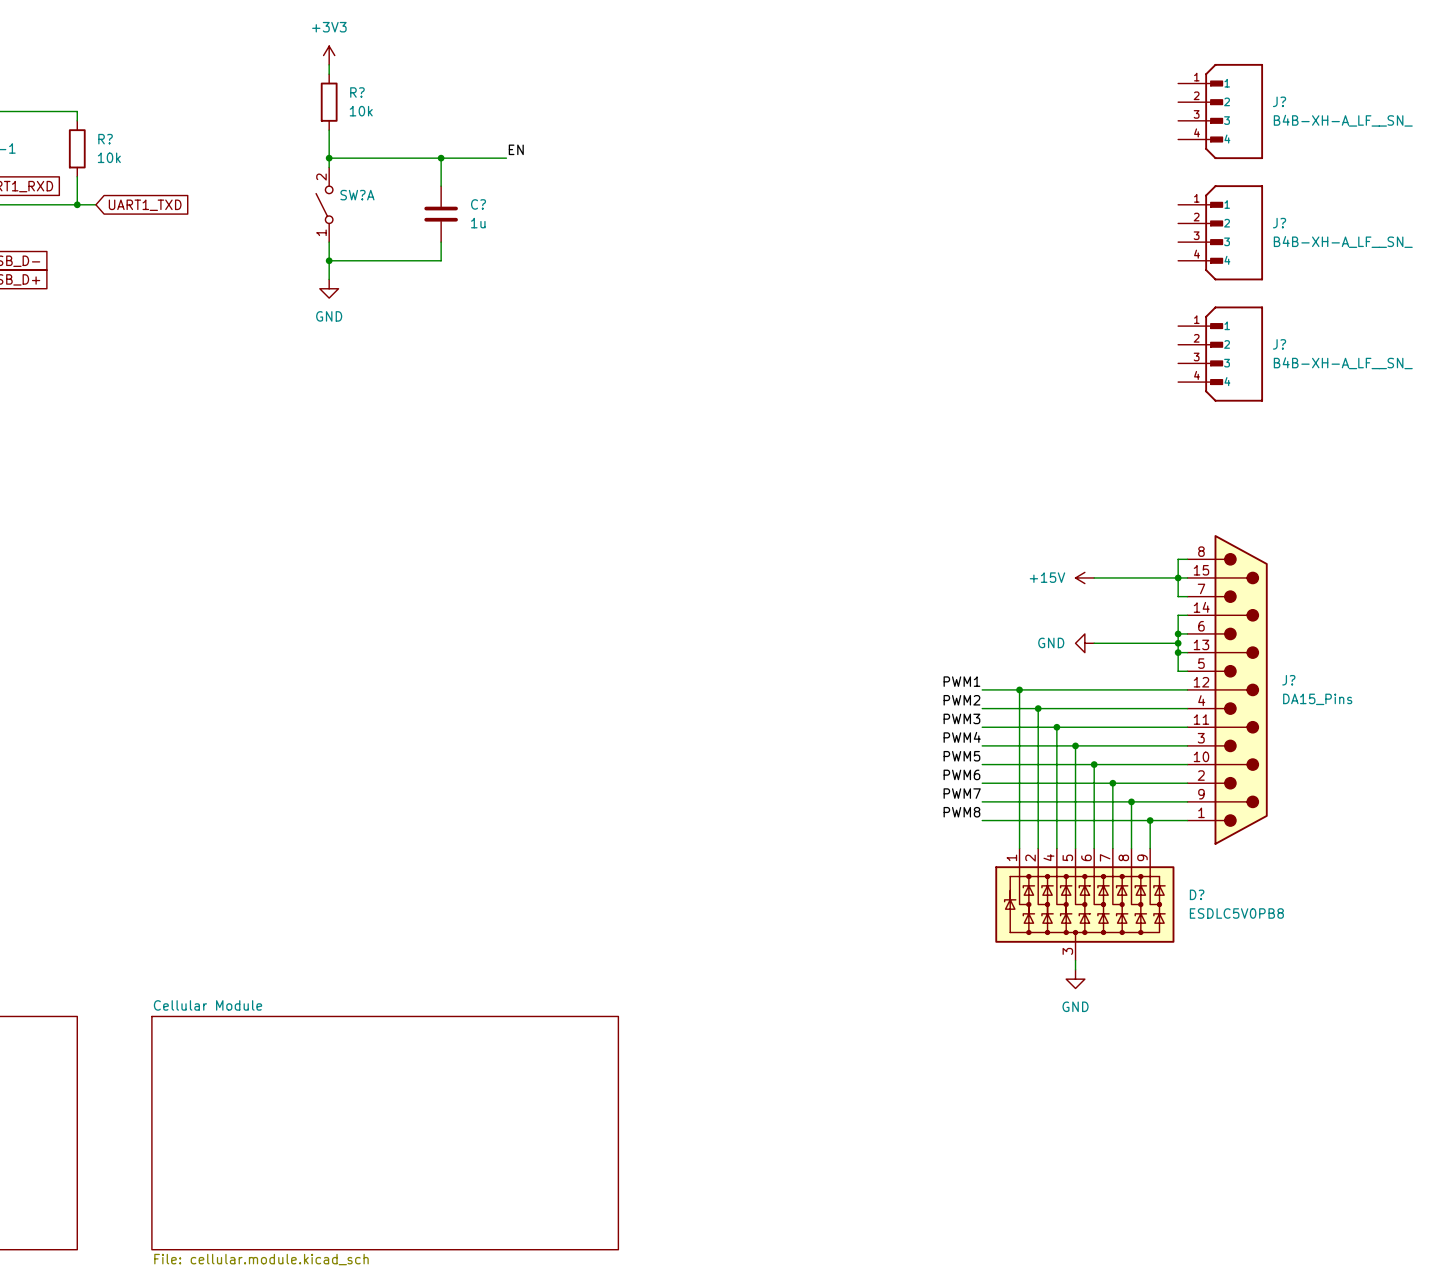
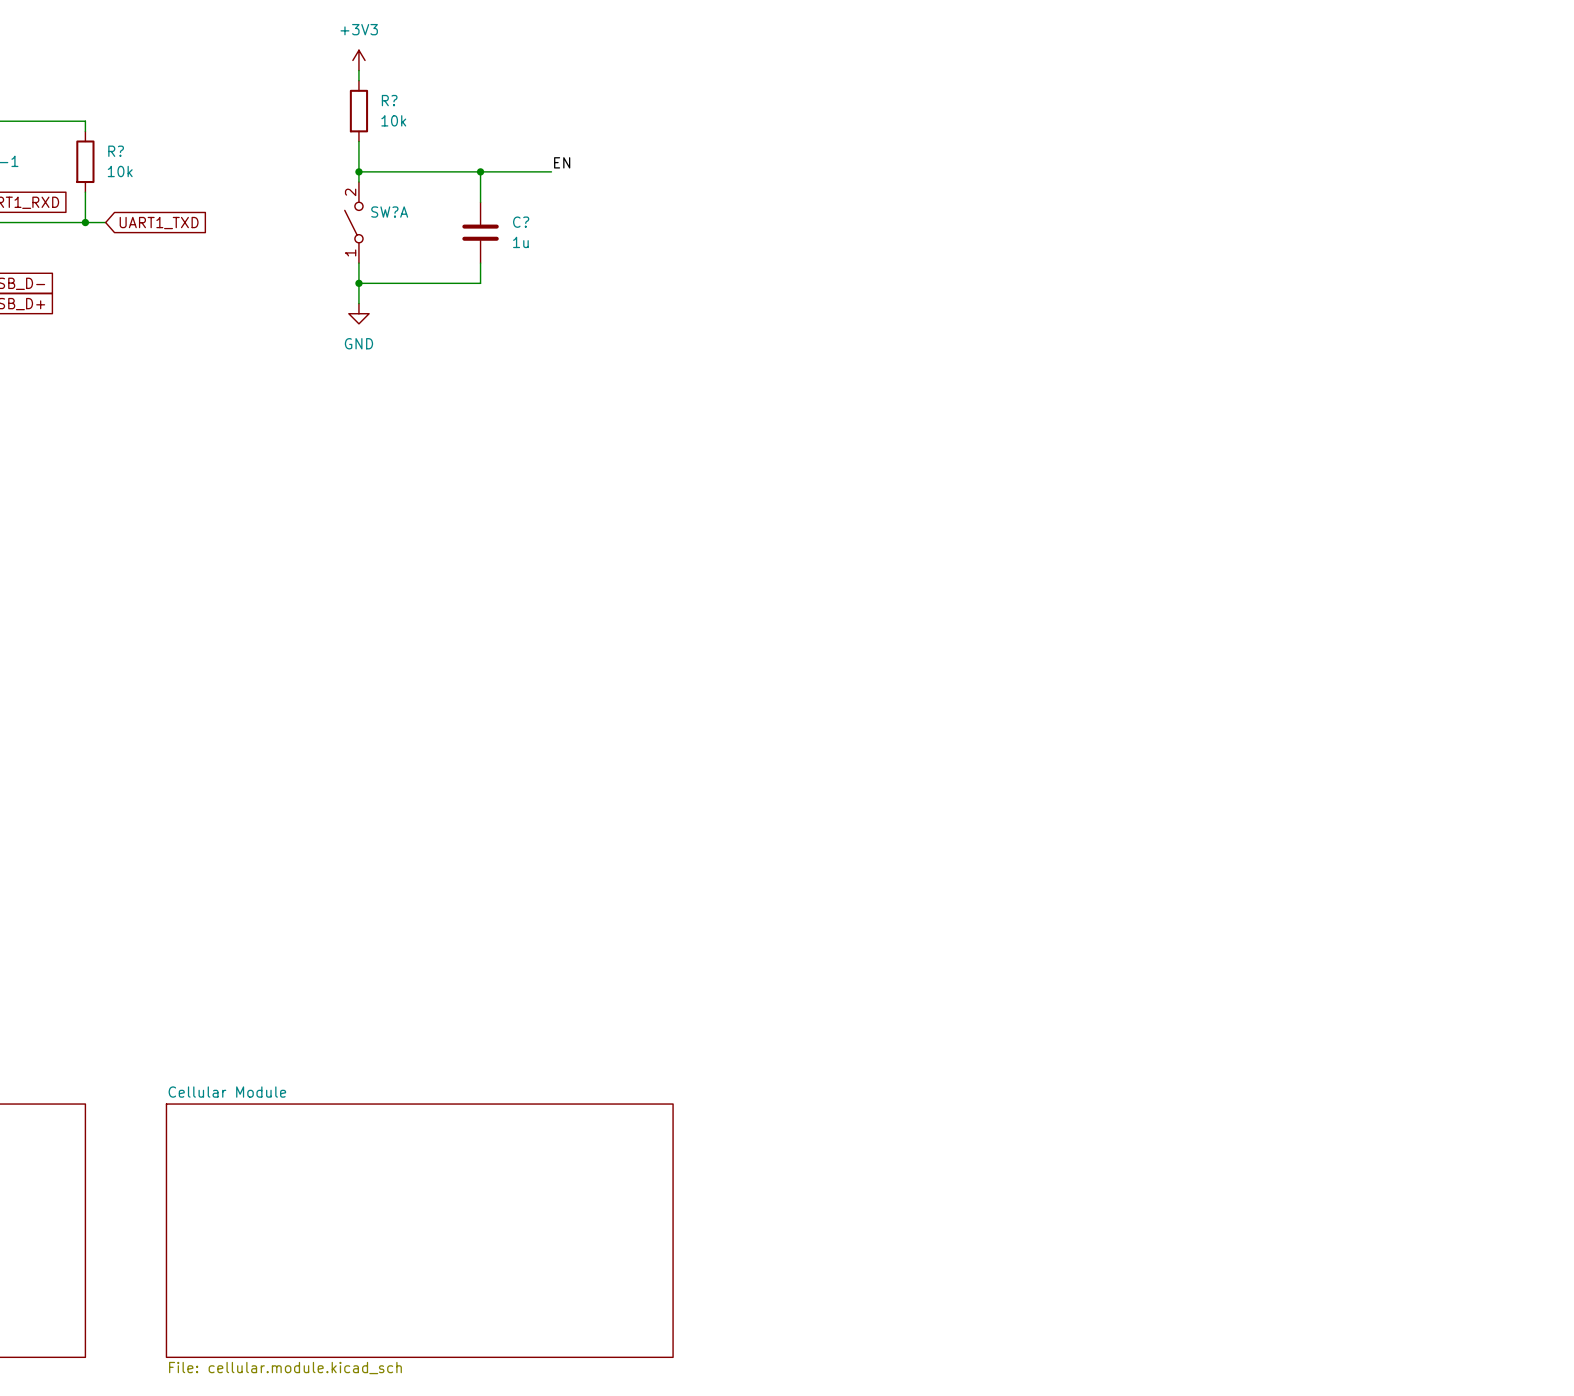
J?: B4B-XH-A_LF__SN_ (1220, 111) -> none
J?: B4B-XH-A_LF__SN_ (1220, 232) -> none
J?: B4B-XH-A_LF__SN_ (1220, 354) -> none
wire: (1187, 559) (1178, 559) (1178, 596) (1187, 596) -> none
power symbol: +15V (1084, 577) -> none
wire: (1094, 577) (1187, 577) -> none
junction: (1178, 577) -> none
wire: (1187, 615) (1178, 615) (1178, 671) (1187, 671) -> none
wire: (1178, 633) (1187, 633) -> none
junction: (1178, 633) -> none
power symbol: GND (1084, 643) -> none
wire: (1094, 643) (1178, 643) -> none
junction: (1178, 643) -> none
wire: (1178, 652) (1187, 652) -> none
junction: (1178, 652) -> none
label: PWM1 (961, 681) -> none
wire: (982, 689) (1187, 689) -> none
wire: (1019, 689) (1019, 848) -> none
junction: (1019, 689) -> none
J?: DA15_Pins (1227, 689) -> none
label: PWM2 (961, 700) -> none
wire: (982, 708) (1187, 708) -> none
wire: (1038, 708) (1038, 848) -> none
junction: (1038, 708) -> none
label: PWM3 (961, 718) -> none
wire: (982, 727) (1187, 727) -> none
wire: (1056, 727) (1056, 848) -> none
junction: (1056, 727) -> none
label: PWM4 (962, 737) -> none
wire: (982, 745) (1187, 745) -> none
wire: (1075, 745) (1075, 848) -> none
junction: (1075, 745) -> none
label: PWM5 (961, 756) -> none
wire: (982, 764) (1187, 764) -> none
wire: (1094, 764) (1094, 848) -> none
junction: (1094, 764) -> none
label: PWM6 (961, 774) -> none
wire: (982, 783) (1187, 783) -> none
wire: (1112, 783) (1112, 848) -> none
junction: (1112, 783) -> none
label: PWM7 (962, 793) -> none
wire: (982, 801) (1187, 801) -> none
wire: (1131, 801) (1131, 848) -> none
junction: (1131, 801) -> none
label: PWM8 (961, 812) -> none
wire: (982, 820) (1187, 820) -> none
wire: (1150, 820) (1150, 848) -> none
junction: (1150, 820) -> none
D?: ESDLC5V0PB8 (1084, 904) -> none
wire: (1075, 960) (1075, 969) -> none
power symbol: GND (1075, 979) -> none

